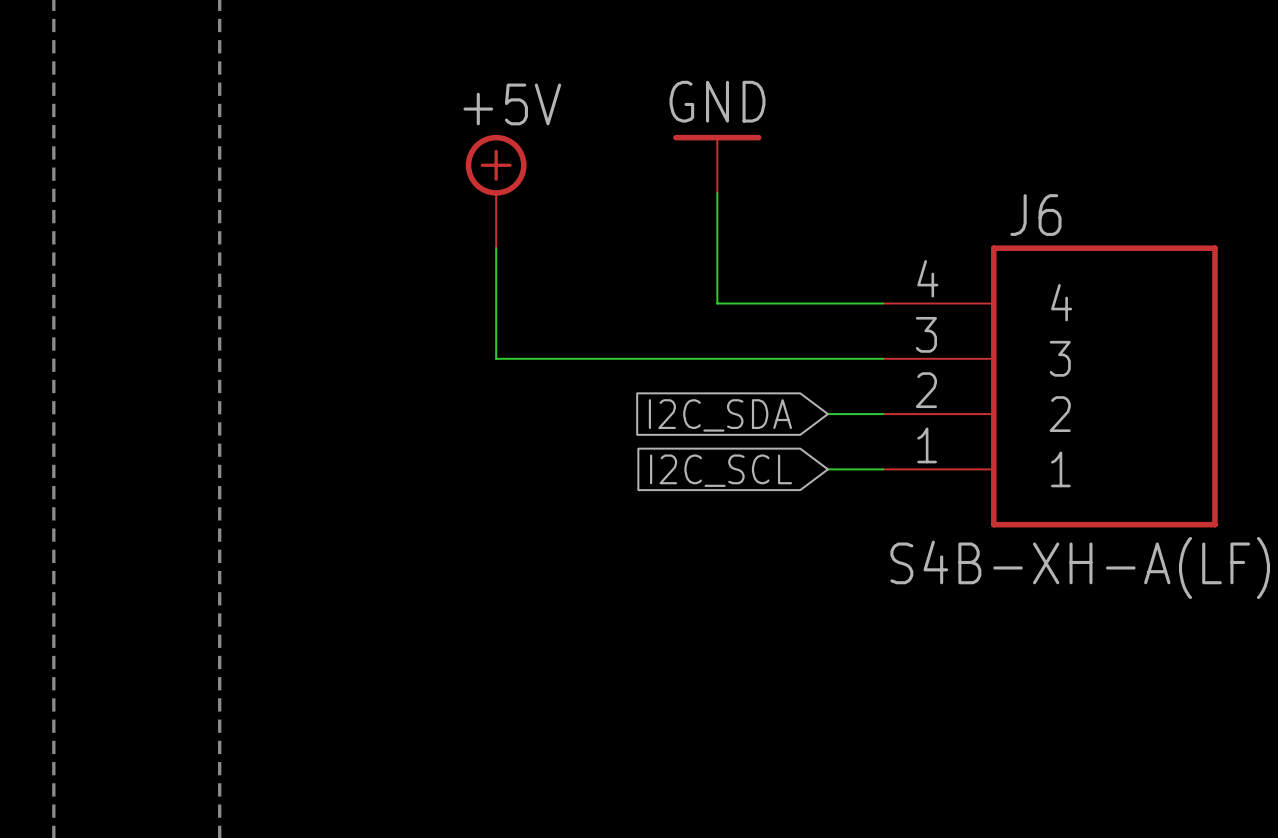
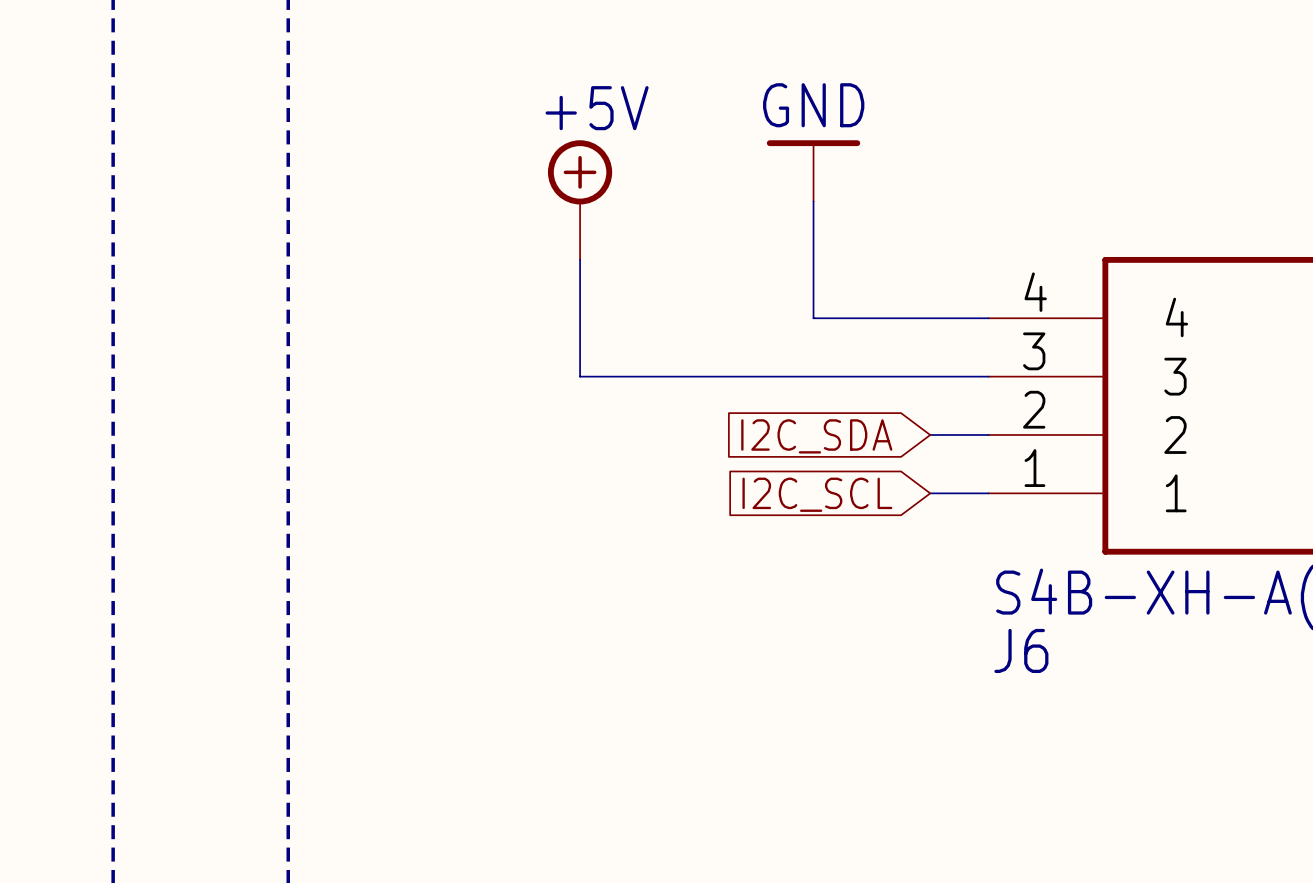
J6 name position: J6 (1035, 215) -> J6 (1021, 650)

